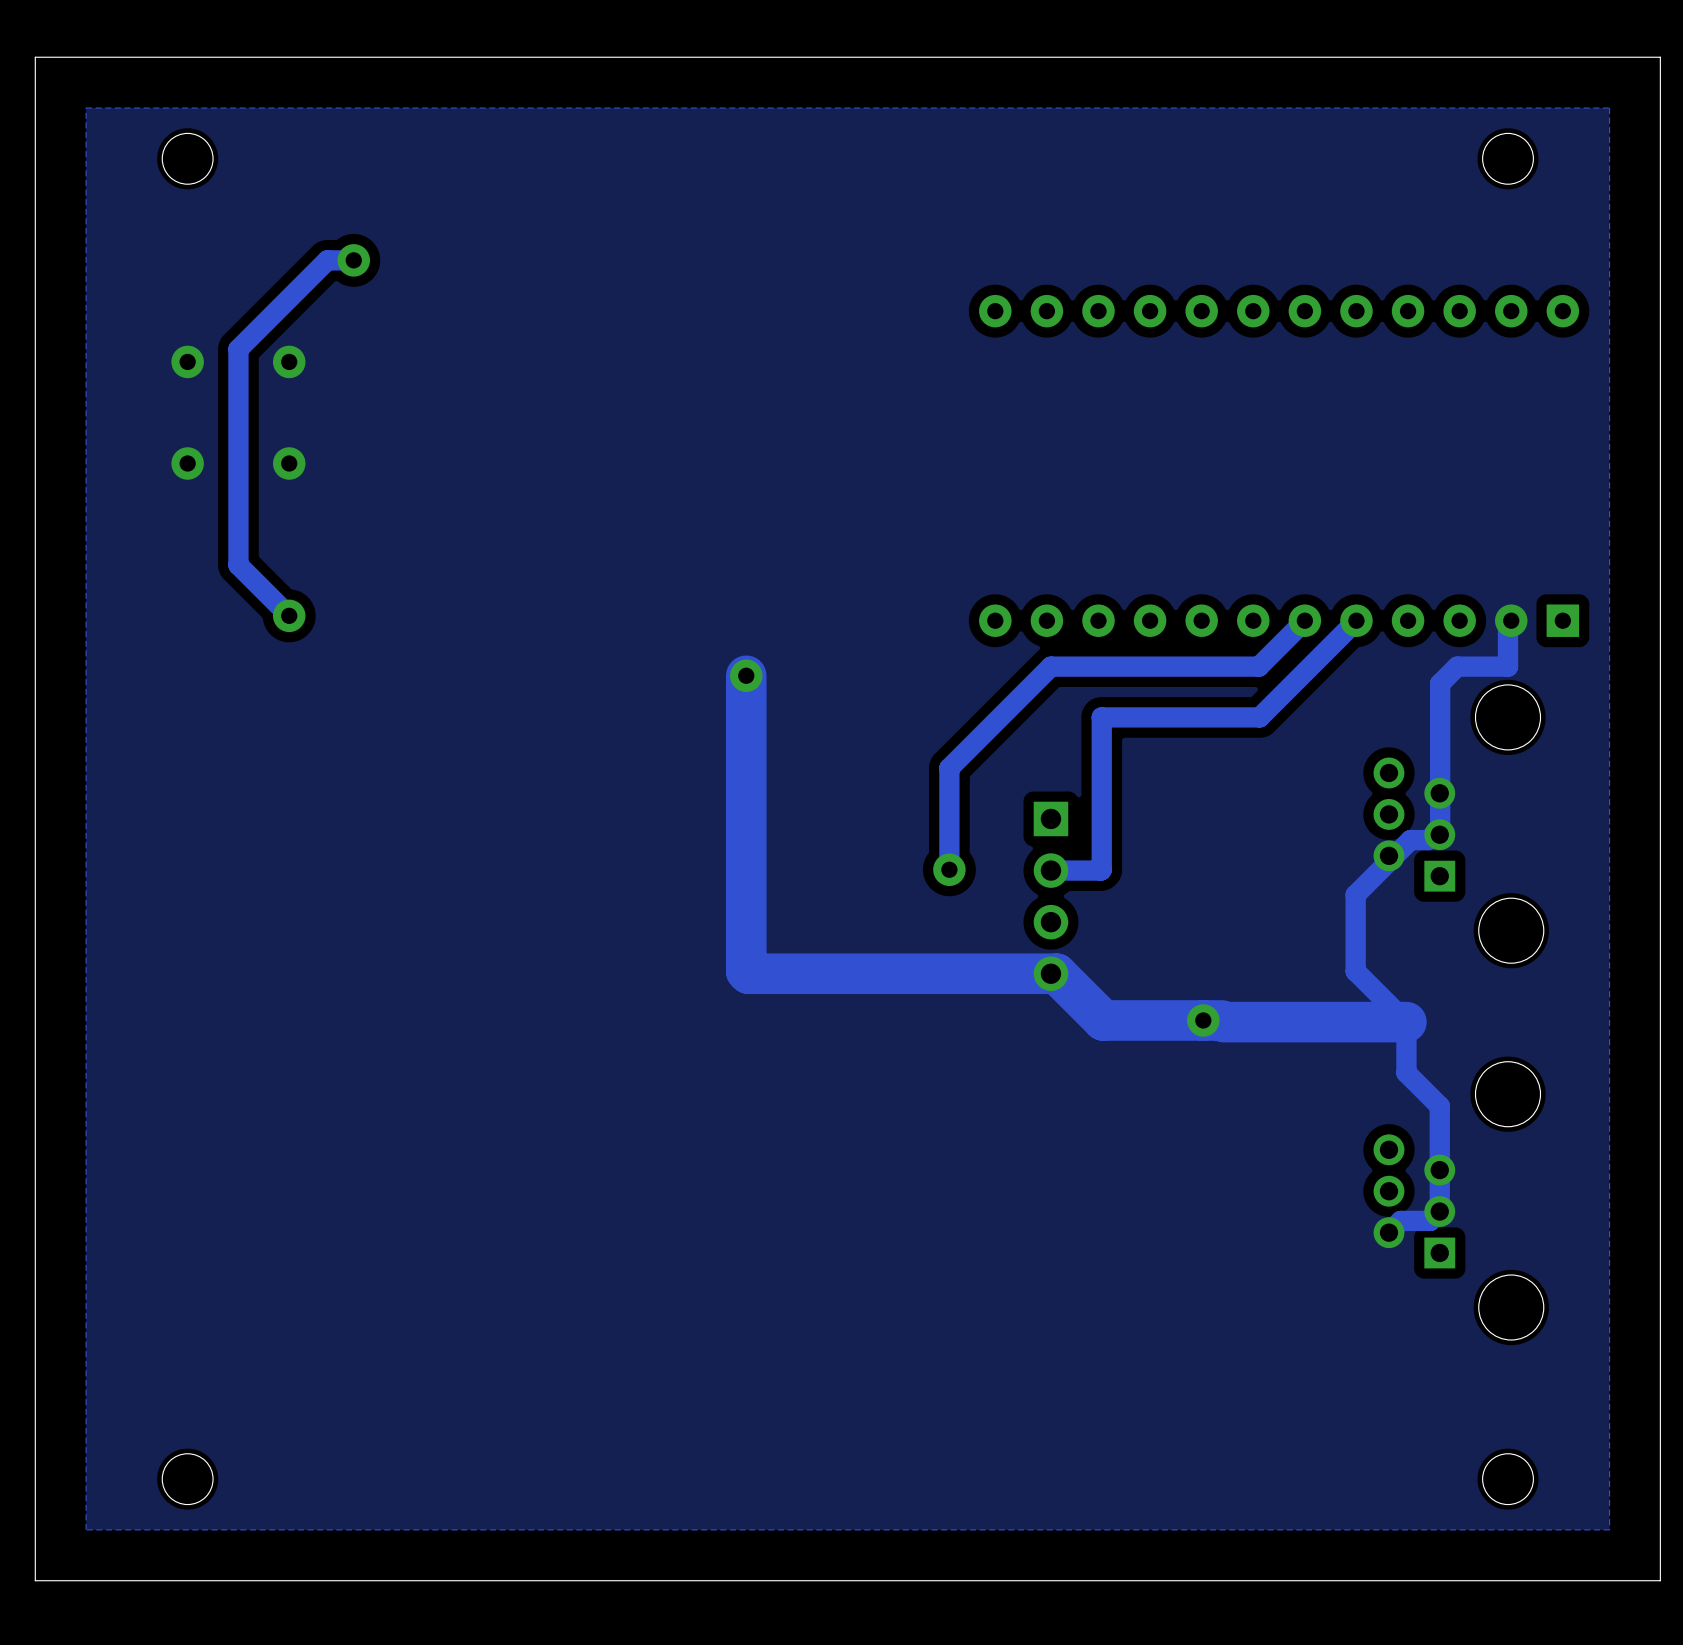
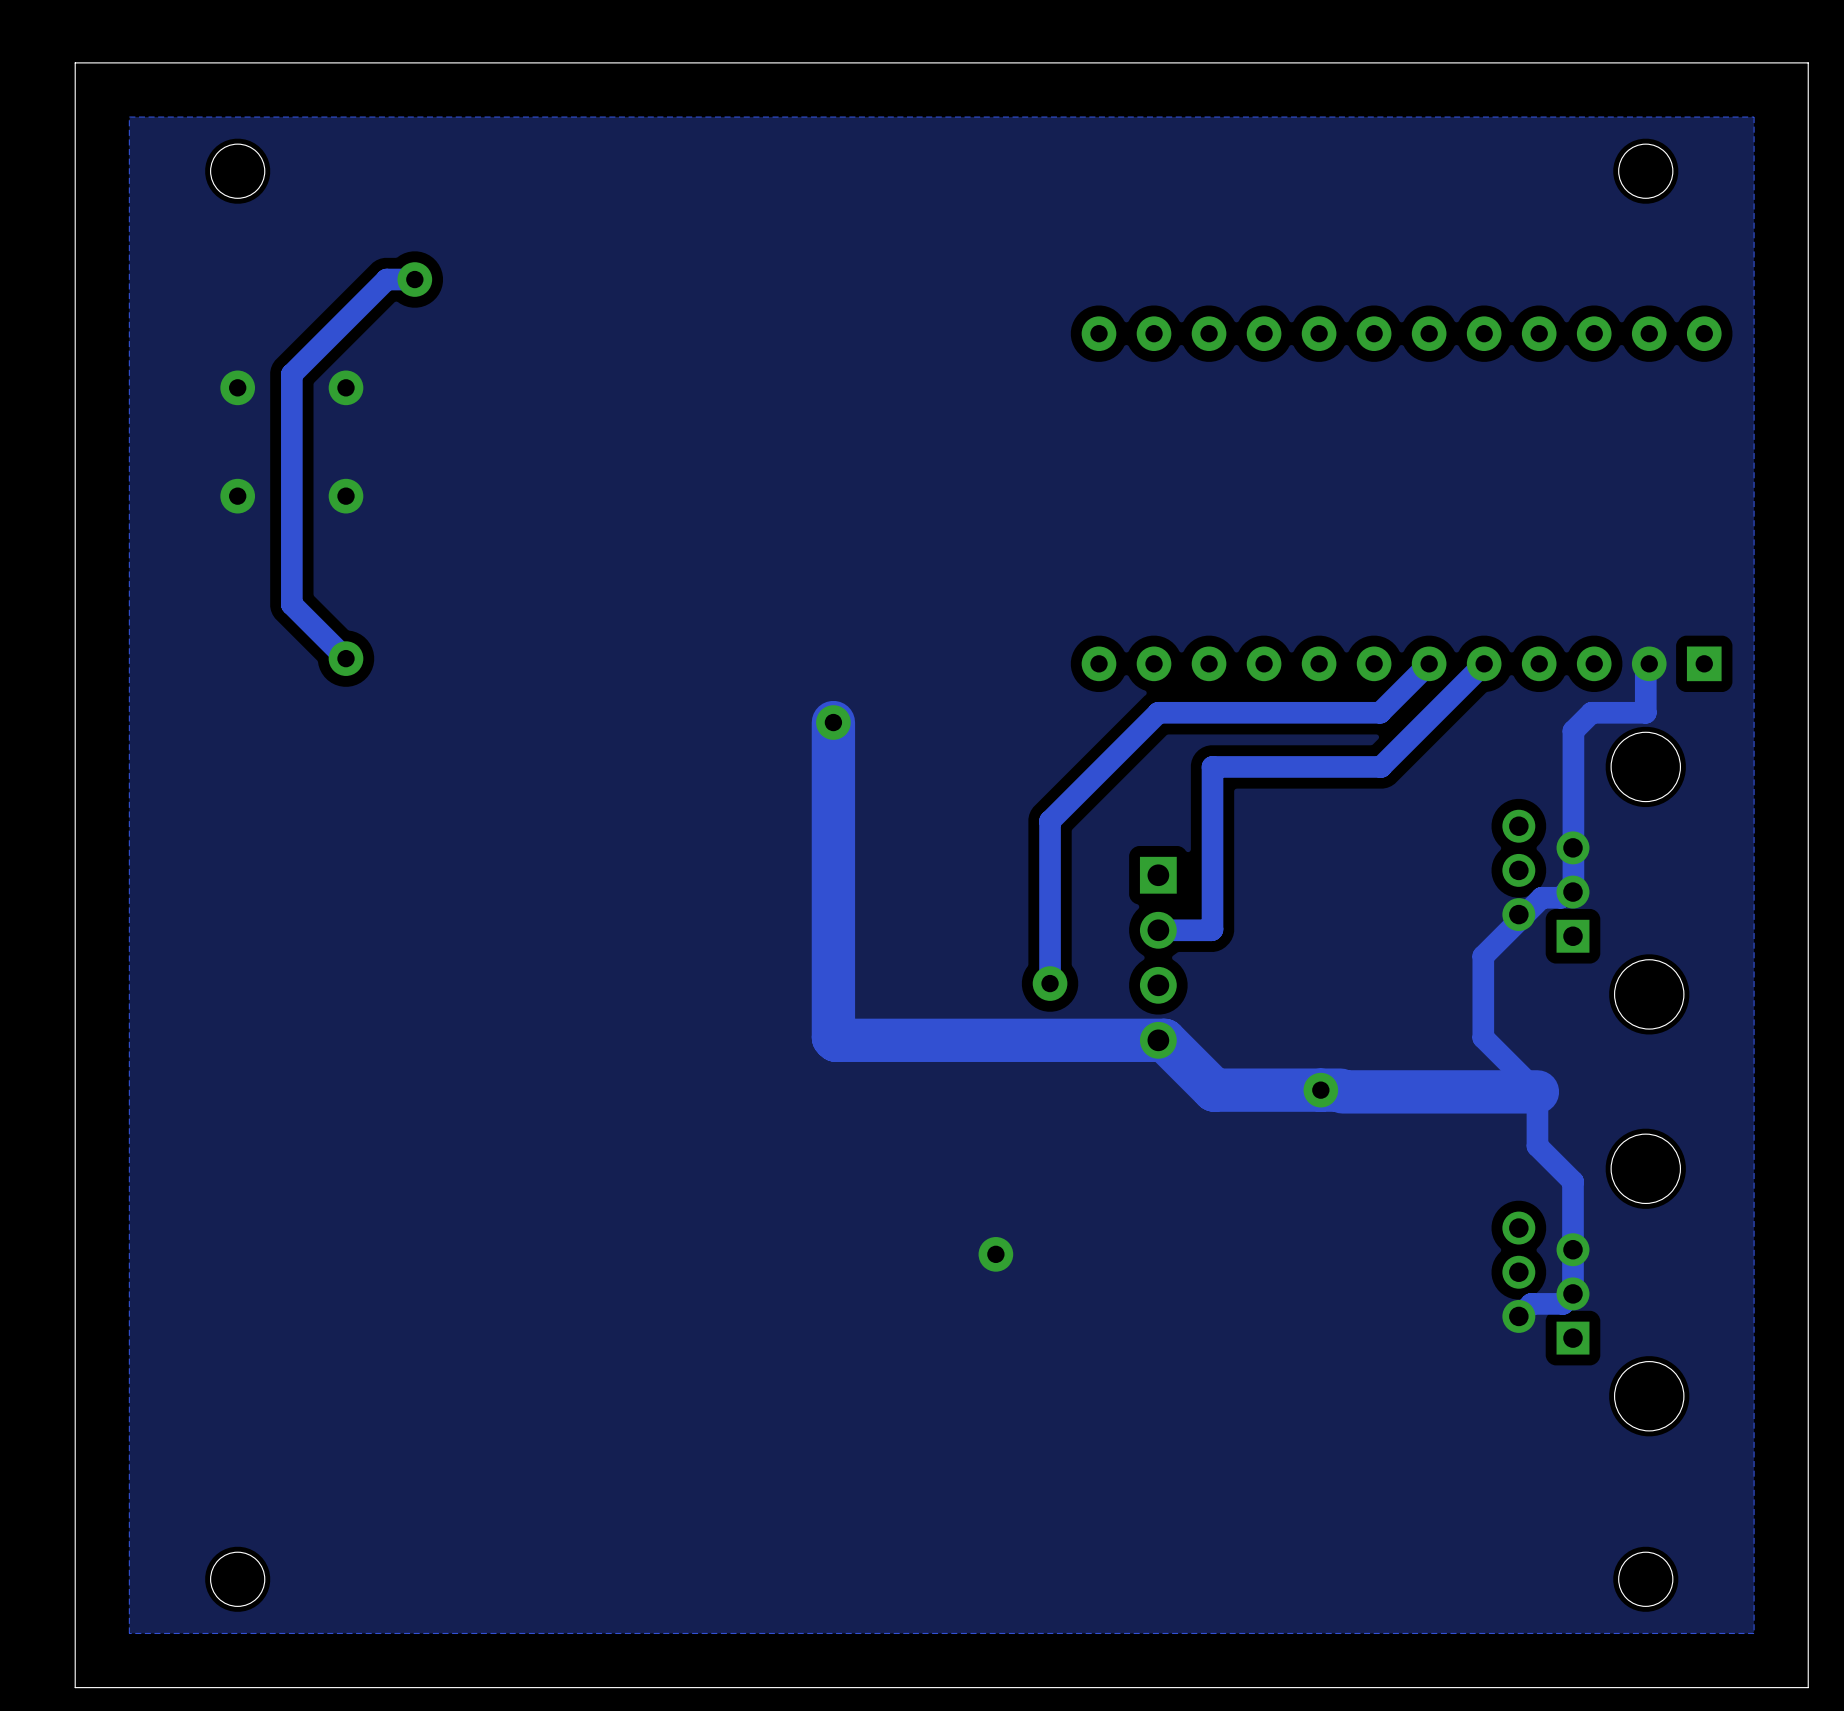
track: none -> (1050, 929) (1050, 983)
via position: (949, 869) -> (1050, 983)
via: none -> (995, 1254)

